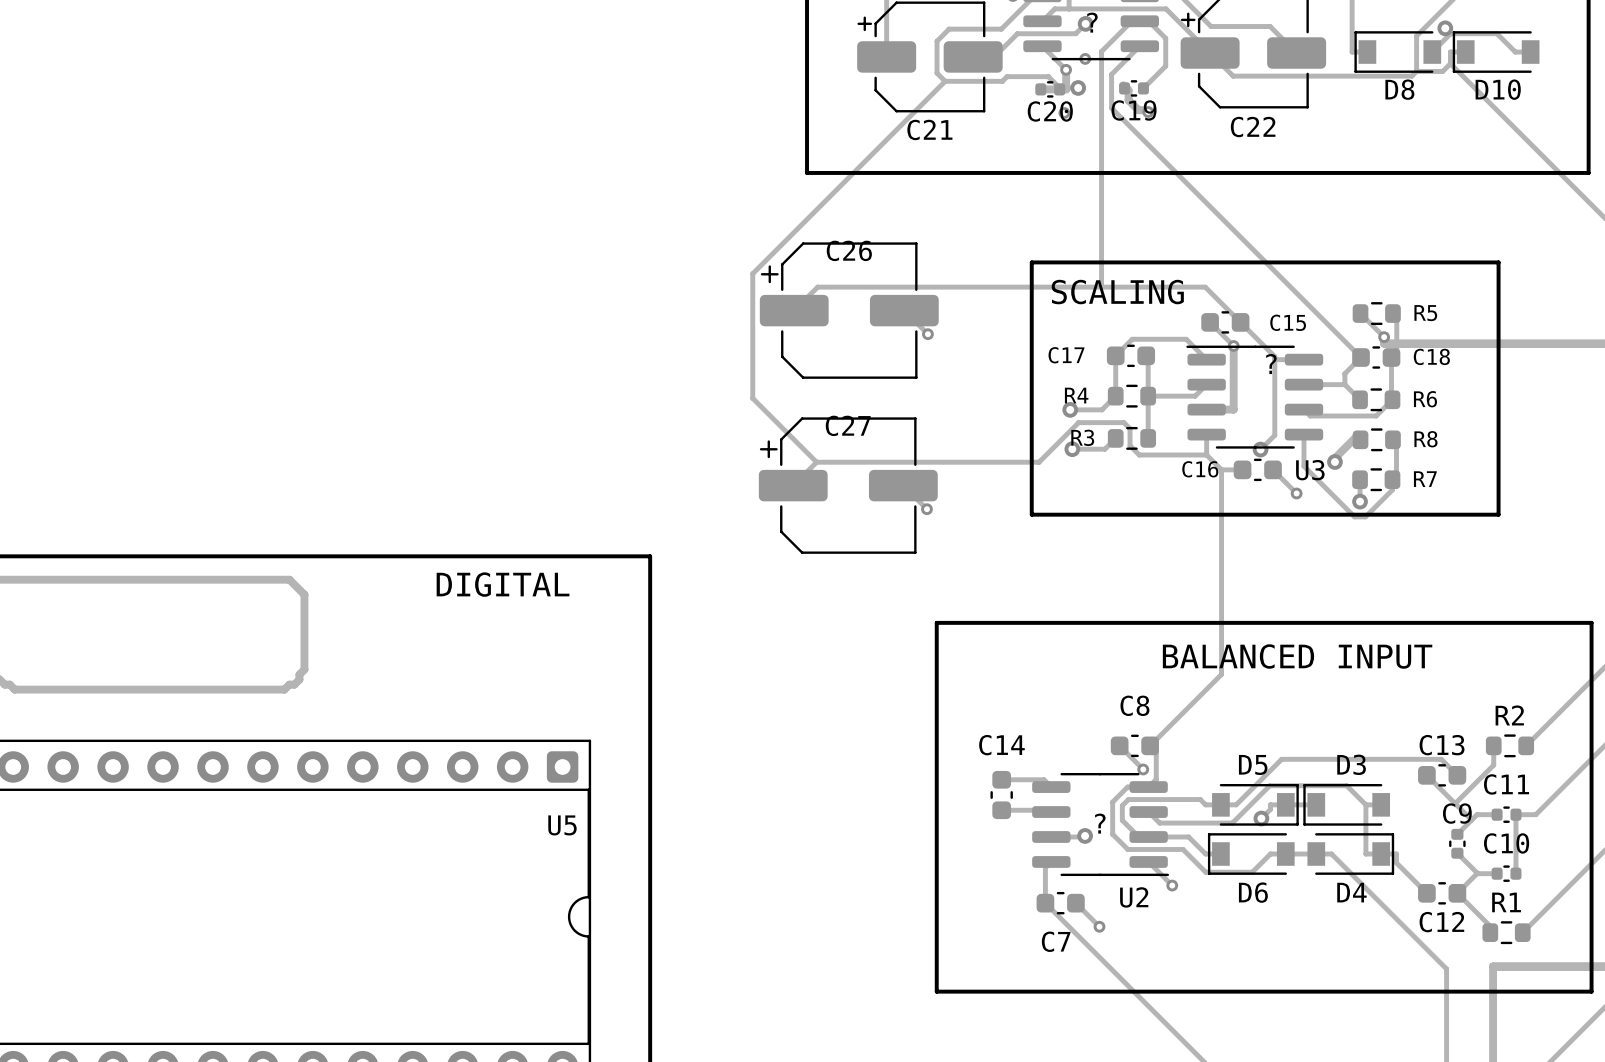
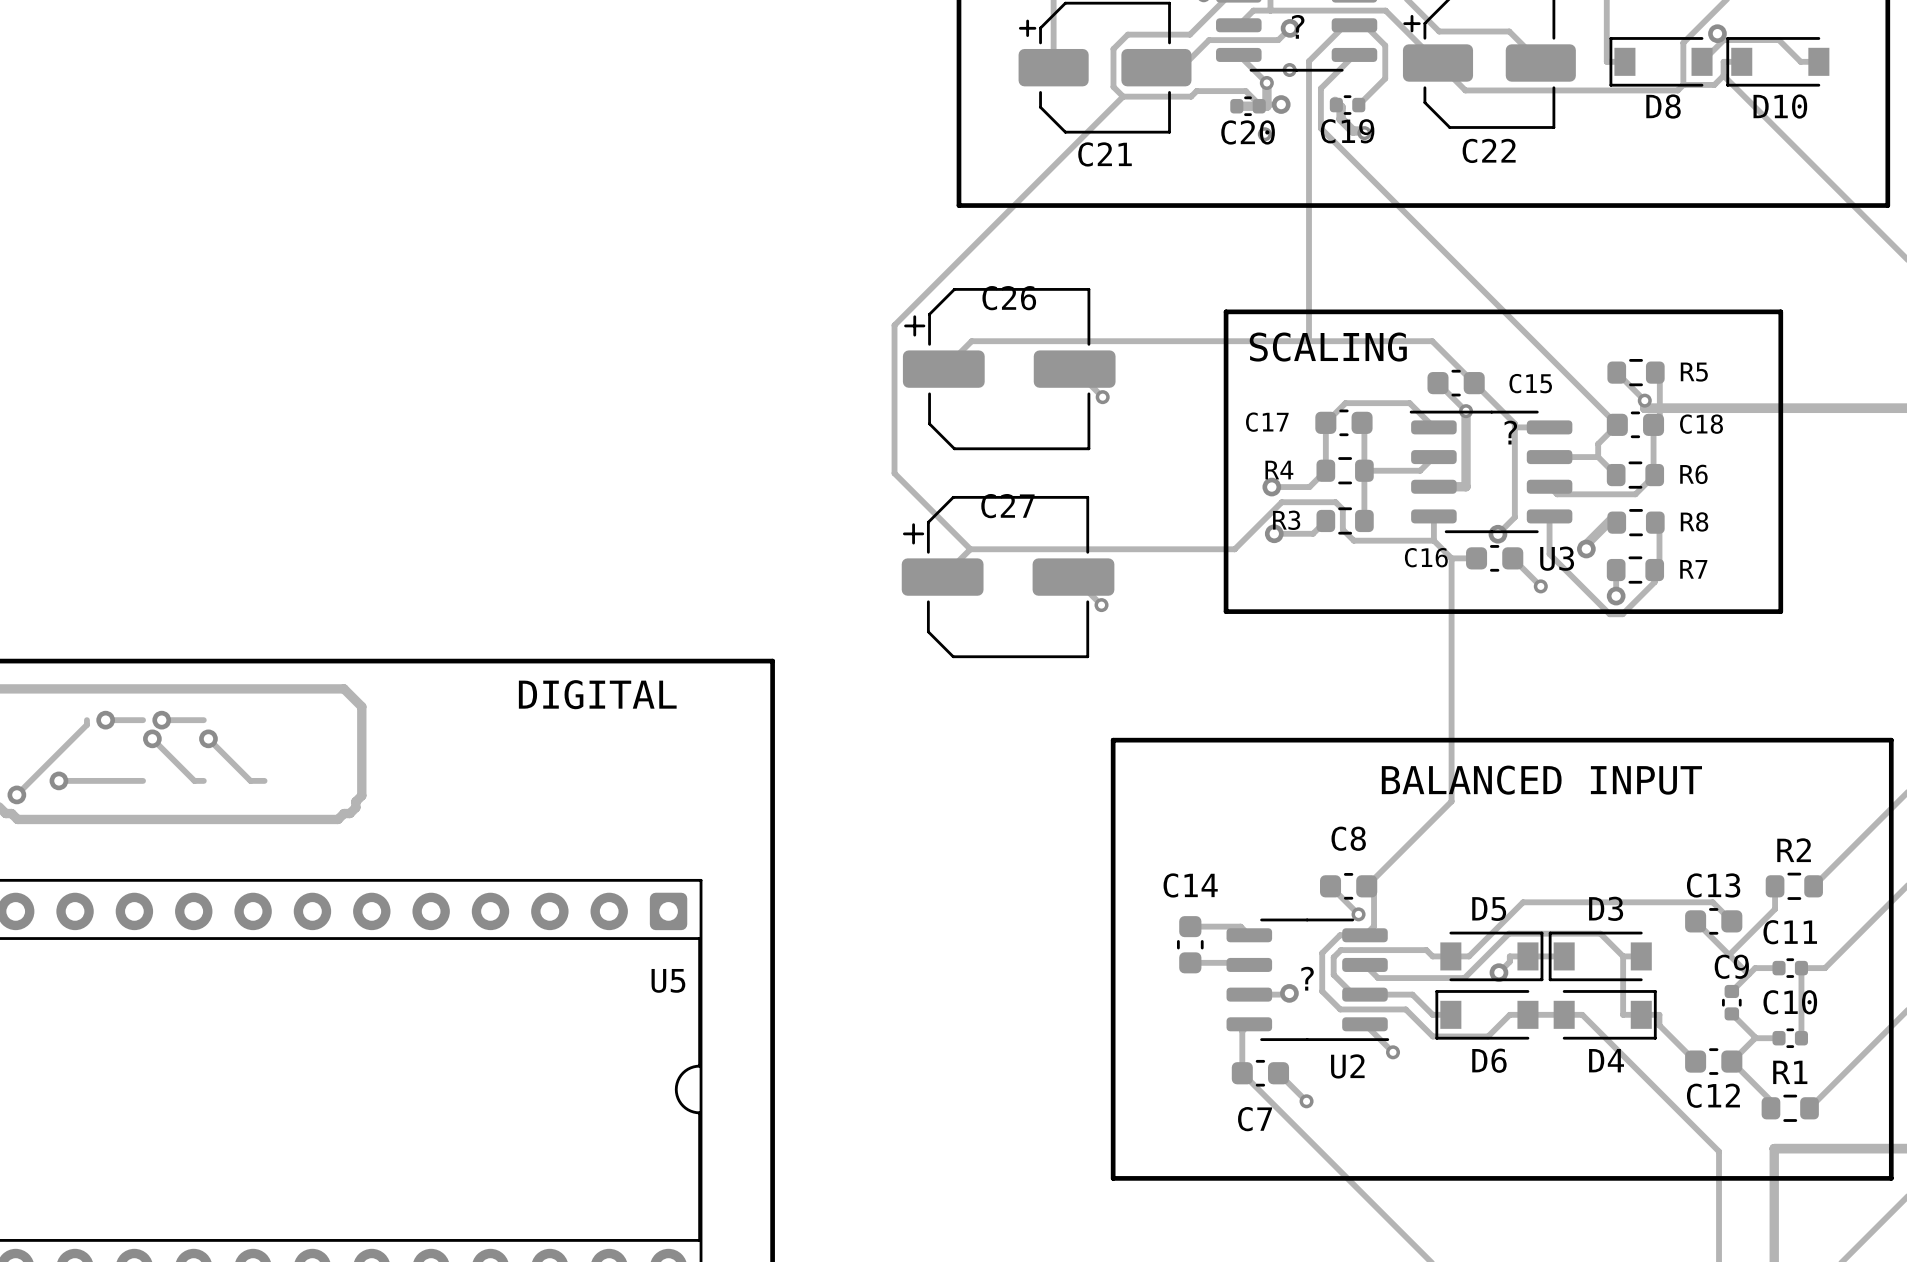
track: none -> (86, 720) (86, 724) (16, 794)
track: none -> (105, 720) (143, 720)
via: none -> (105, 720)
track: none -> (161, 720) (203, 720)
via: none -> (161, 720)
track: none -> (152, 738) (194, 780) (203, 780)
via: none -> (152, 738)
track: none -> (208, 738) (250, 780) (264, 780)
via: none -> (208, 738)
track: none -> (58, 780) (143, 780)
via: none -> (58, 780)
via: none -> (16, 794)

